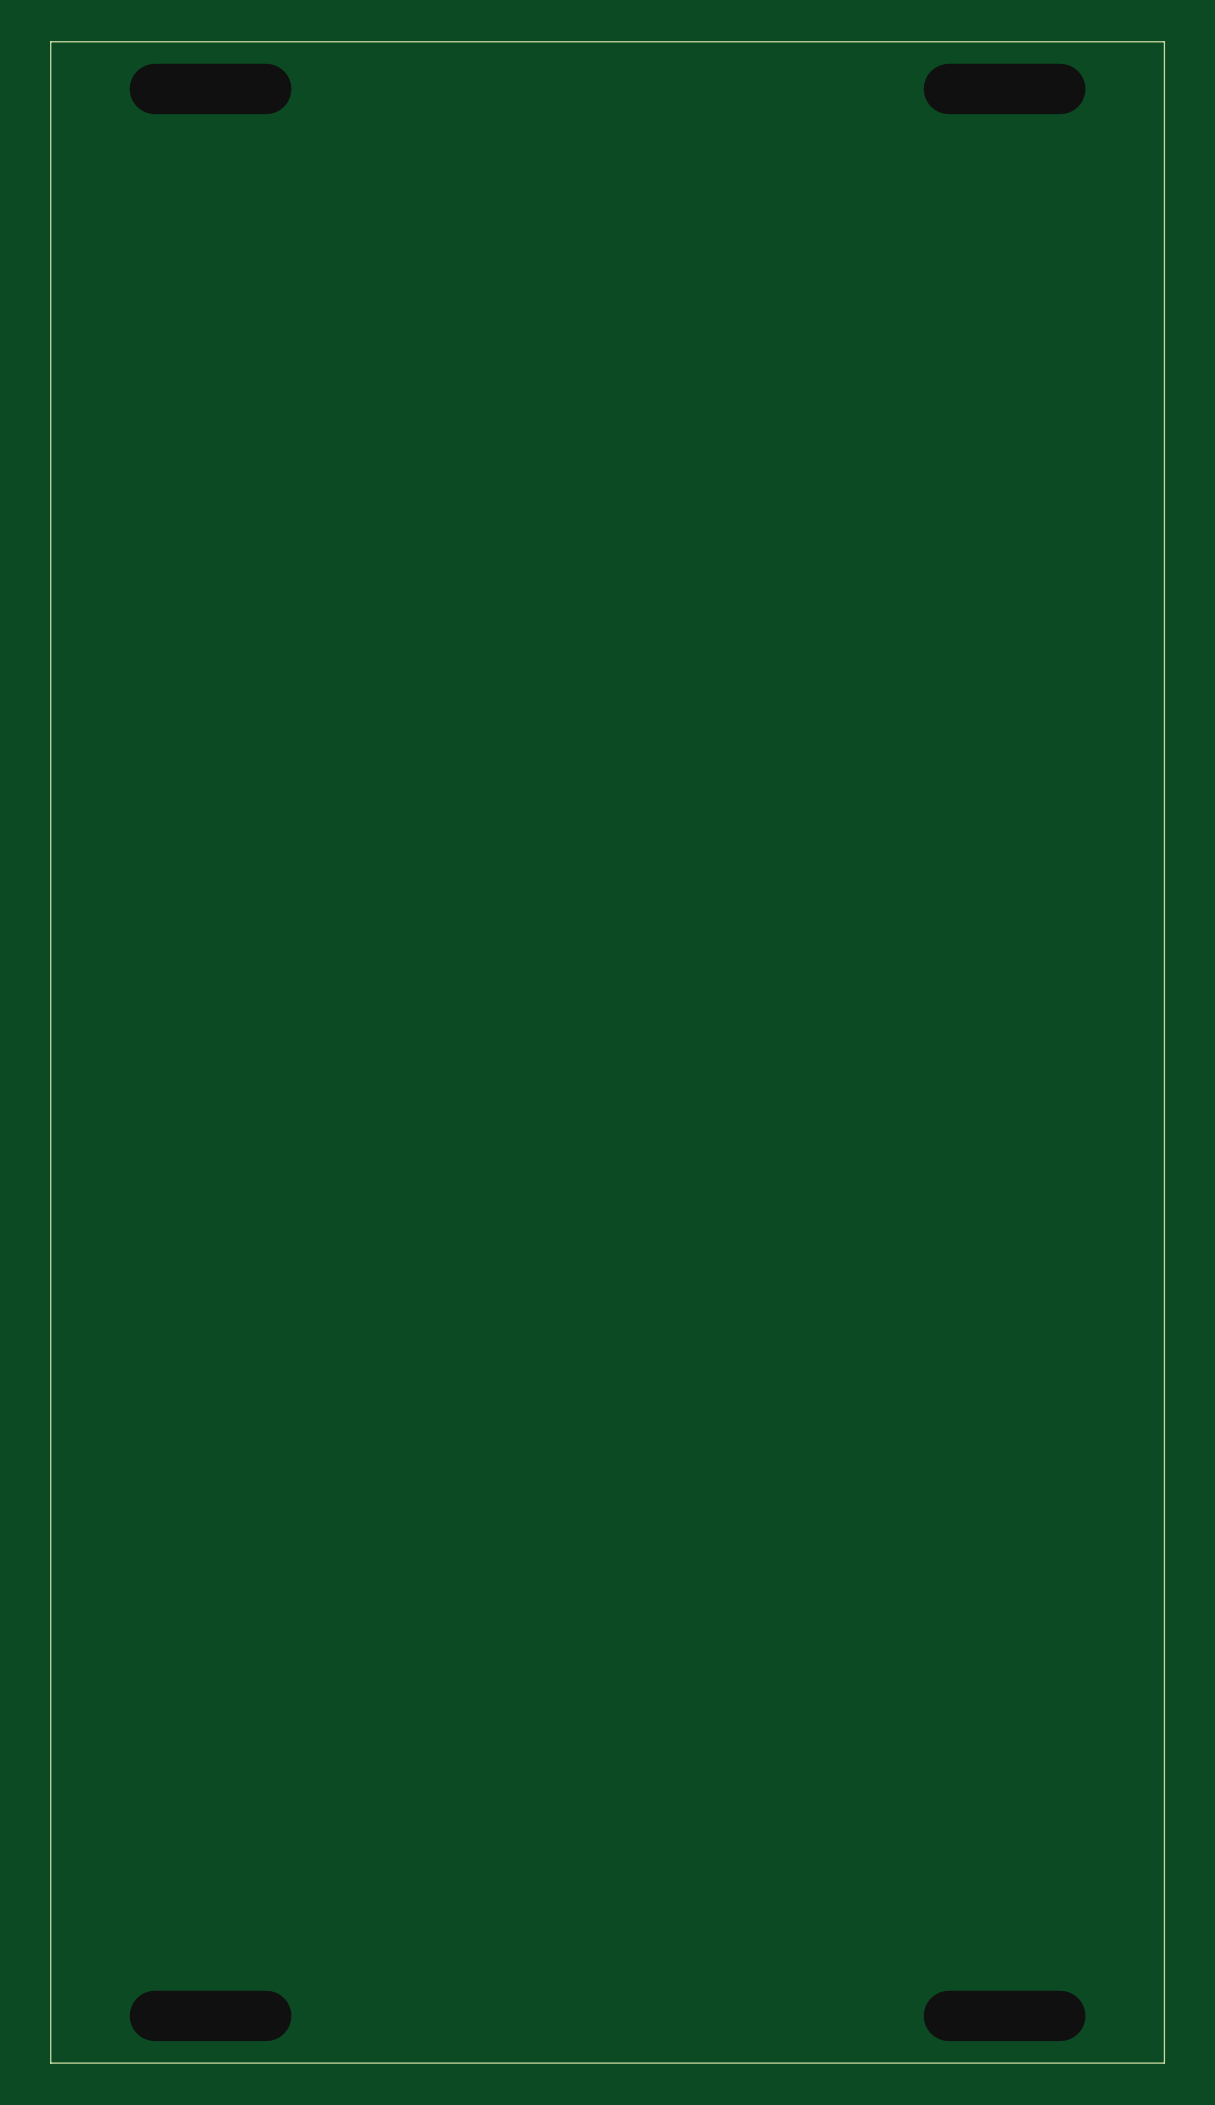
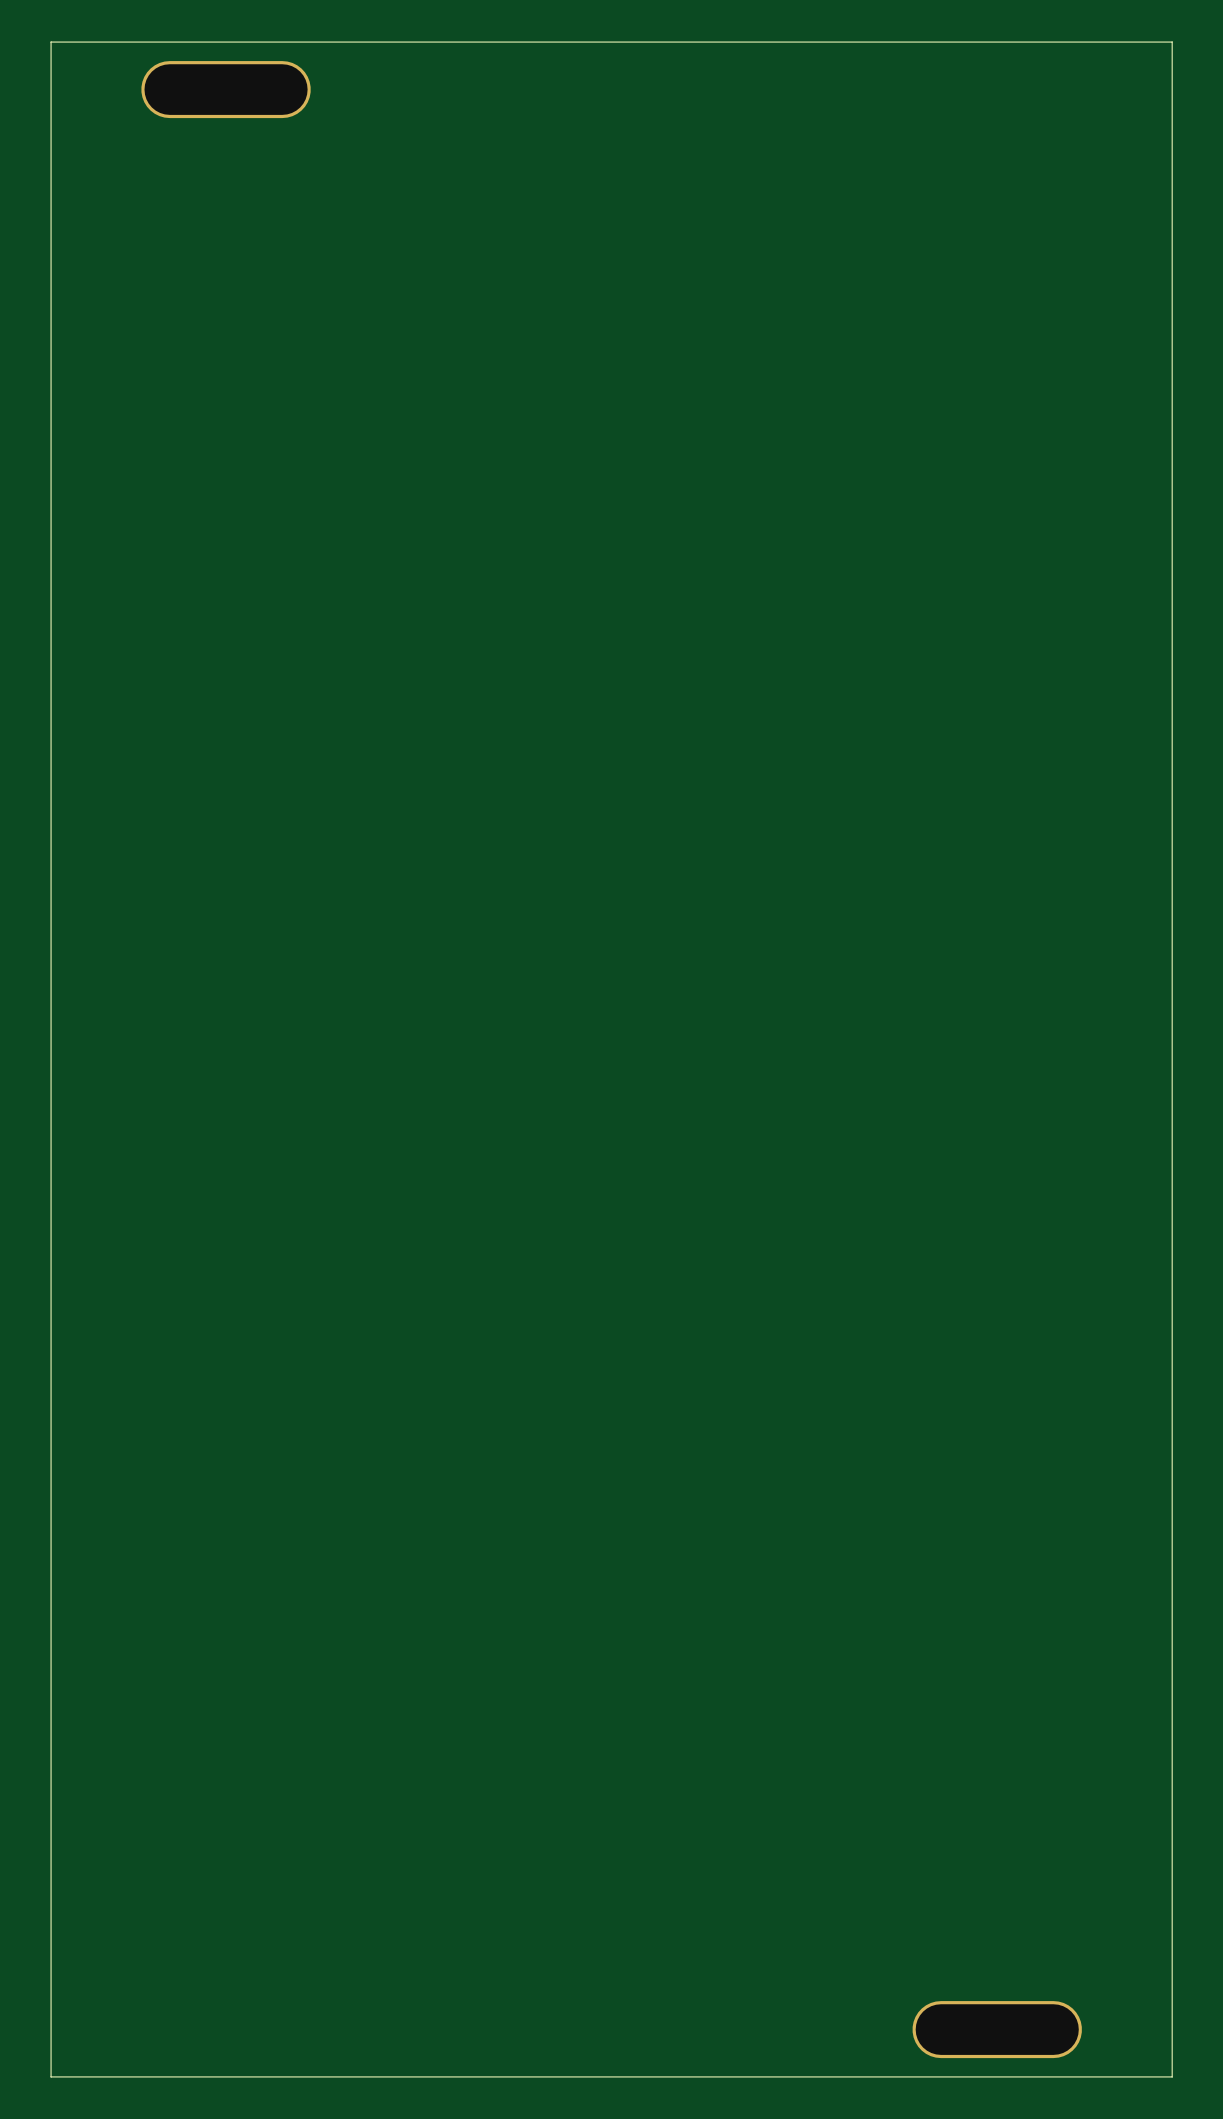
part footprint: [129, 63, 292, 115] -> [141, 61, 311, 119]
part: (1004, 88) -> none
part footprint: [923, 1990, 1086, 2042] -> [912, 2001, 1082, 2059]
part: (210, 2015) -> none

